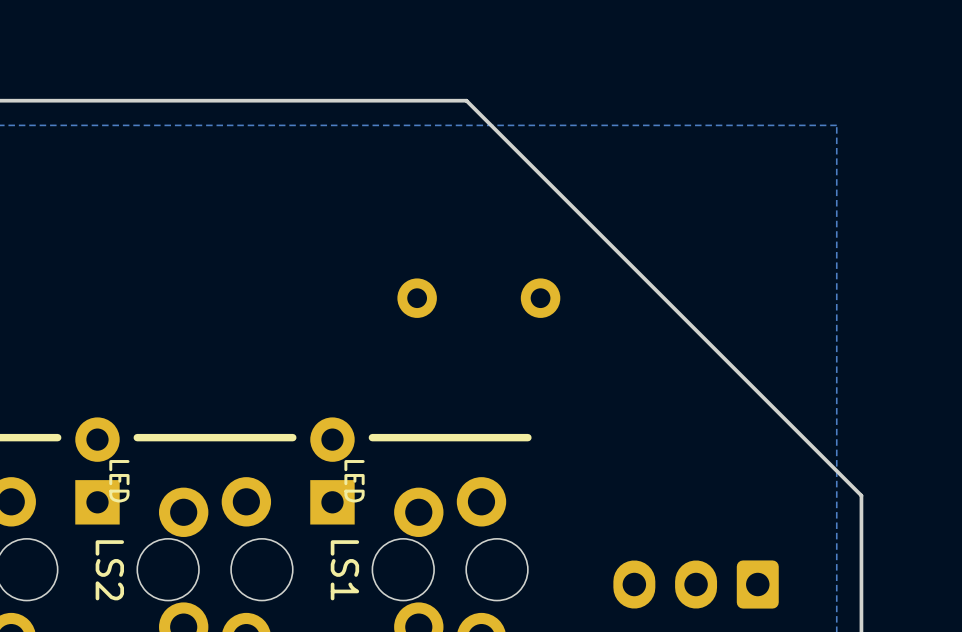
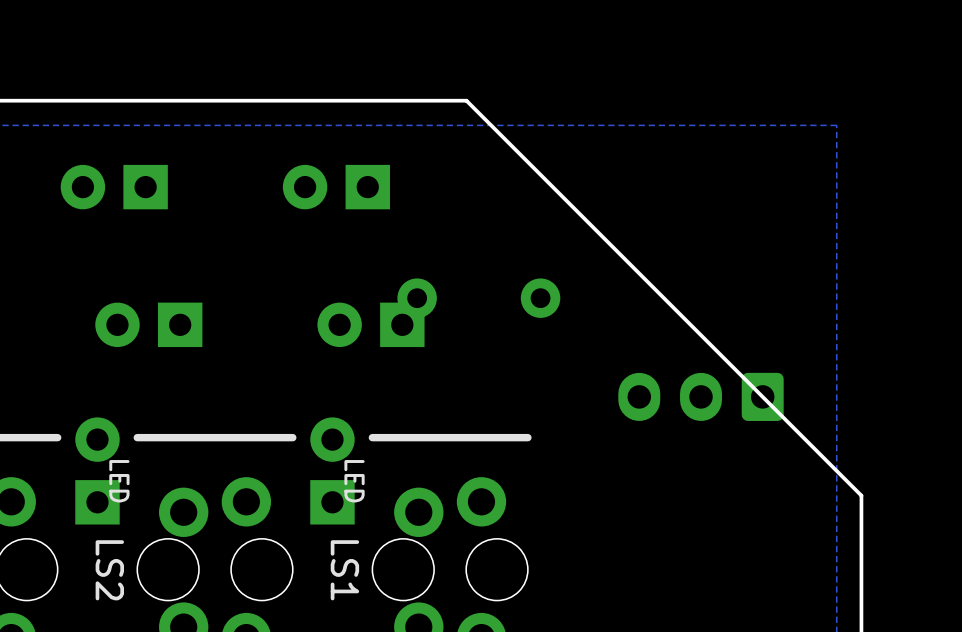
part: none -> (114, 187)
part: none -> (336, 187)
part: none -> (148, 324)
part: none -> (370, 324)
part position: (696, 584) -> (701, 396)

